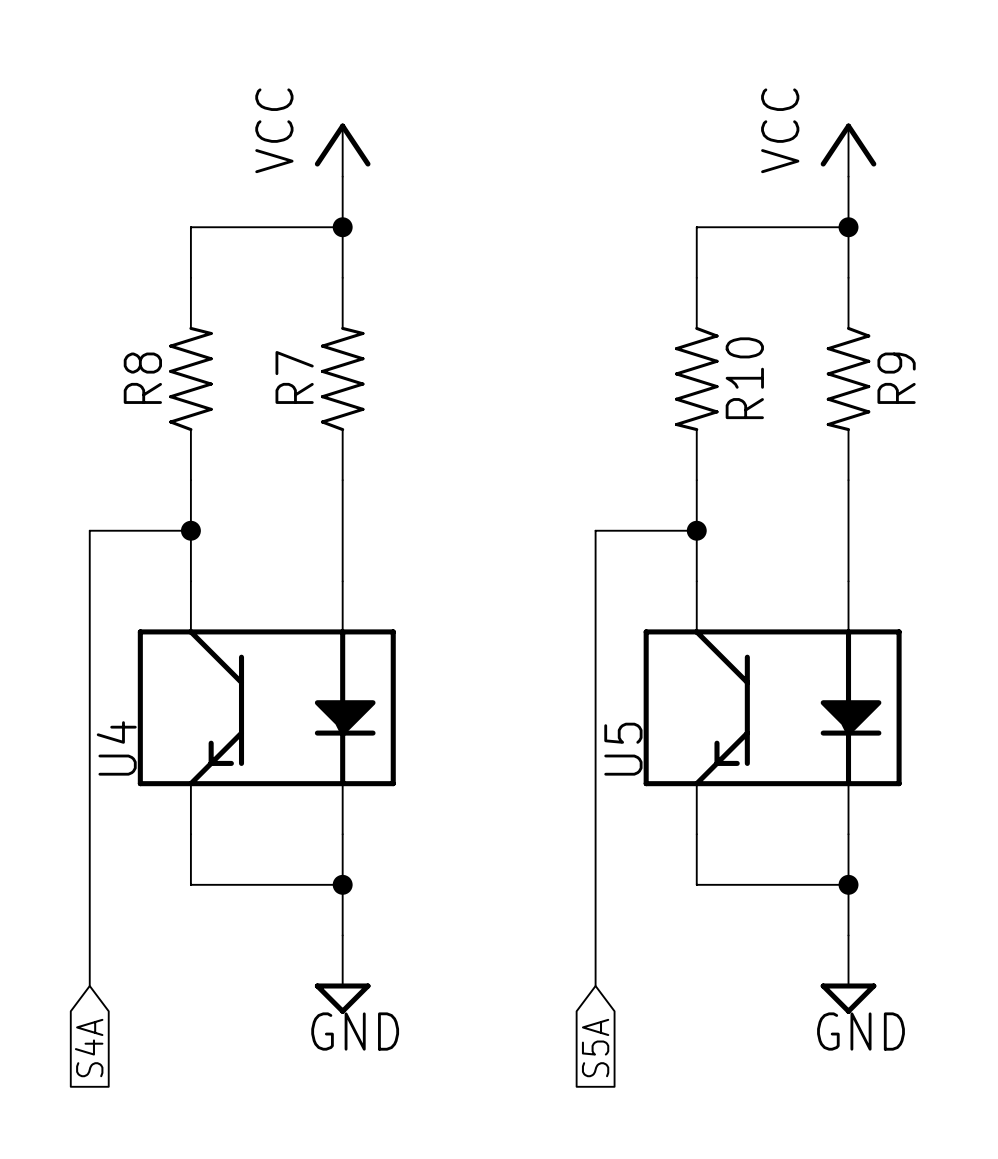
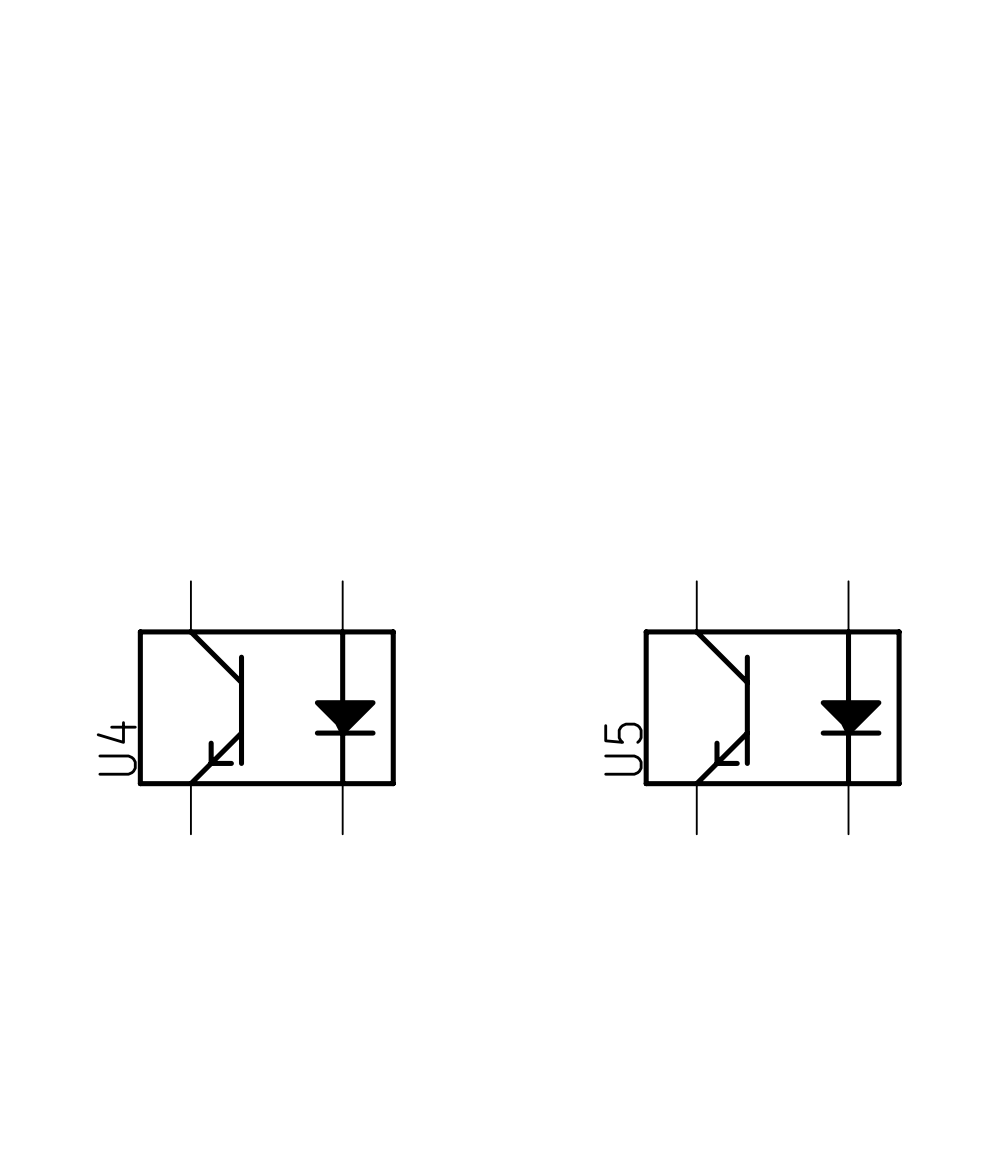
power symbol: VCC (342, 150) -> none
power symbol: VCC (848, 150) -> none
wire: (342, 176) (342, 277) -> none
wire: (848, 176) (848, 277) -> none
wire: (342, 227) (190, 227) (190, 277) -> none
junction: (342, 227) -> none
wire: (848, 227) (696, 227) (696, 277) -> none
junction: (848, 227) -> none
R8: (190, 378) -> none
R7: (342, 378) -> none
R10: (696, 378) -> none
R9: (848, 378) -> none
wire: (190, 480) (190, 581) -> none
wire: (342, 480) (342, 581) -> none
wire: (696, 480) (696, 581) -> none
wire: (848, 480) (848, 581) -> none
wire: (190, 530) (89, 530) (89, 985) -> none
junction: (190, 530) -> none
wire: (696, 530) (595, 530) (595, 985) -> none
junction: (696, 530) -> none
wire: (190, 834) (190, 884) (342, 884) -> none
wire: (342, 834) (342, 935) -> none
wire: (696, 834) (696, 884) (848, 884) -> none
wire: (848, 834) (848, 935) -> none
junction: (342, 884) -> none
junction: (848, 884) -> none
power symbol: GND (342, 974) -> none
power symbol: GND (848, 974) -> none
global label: S4A (89, 1048) -> none
global label: S5A (595, 1048) -> none

